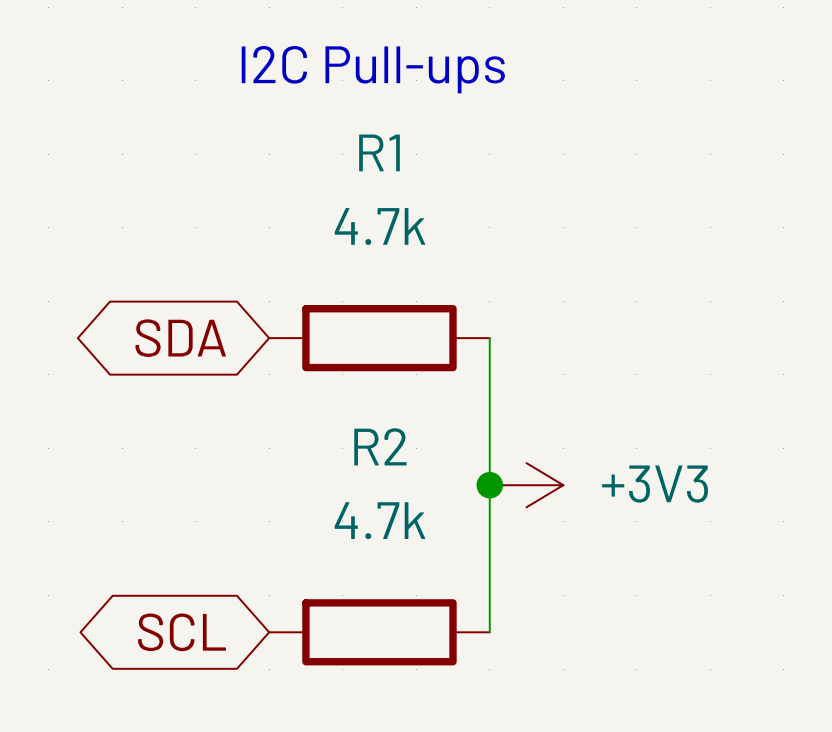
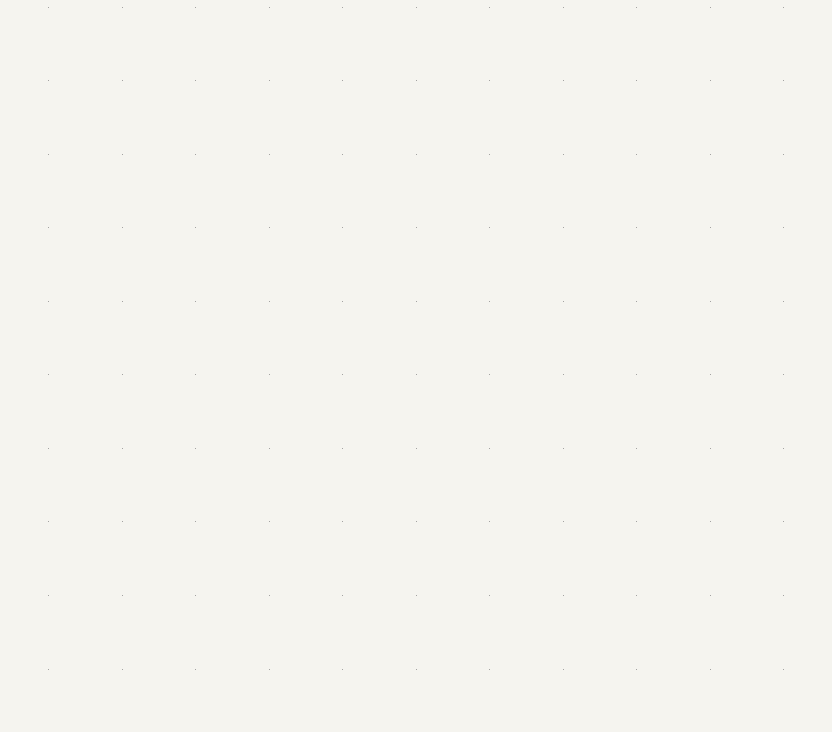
text: I2C Pull-ups (373, 69) -> none
global label: SDA (180, 338) -> none
R1: 4.7k (379, 338) -> none
wire: (489, 338) (489, 632) -> none
junction: (489, 485) -> none
power symbol: +3V3 (526, 485) -> none
global label: SCL (182, 632) -> none
R2: 4.7k (379, 632) -> none

